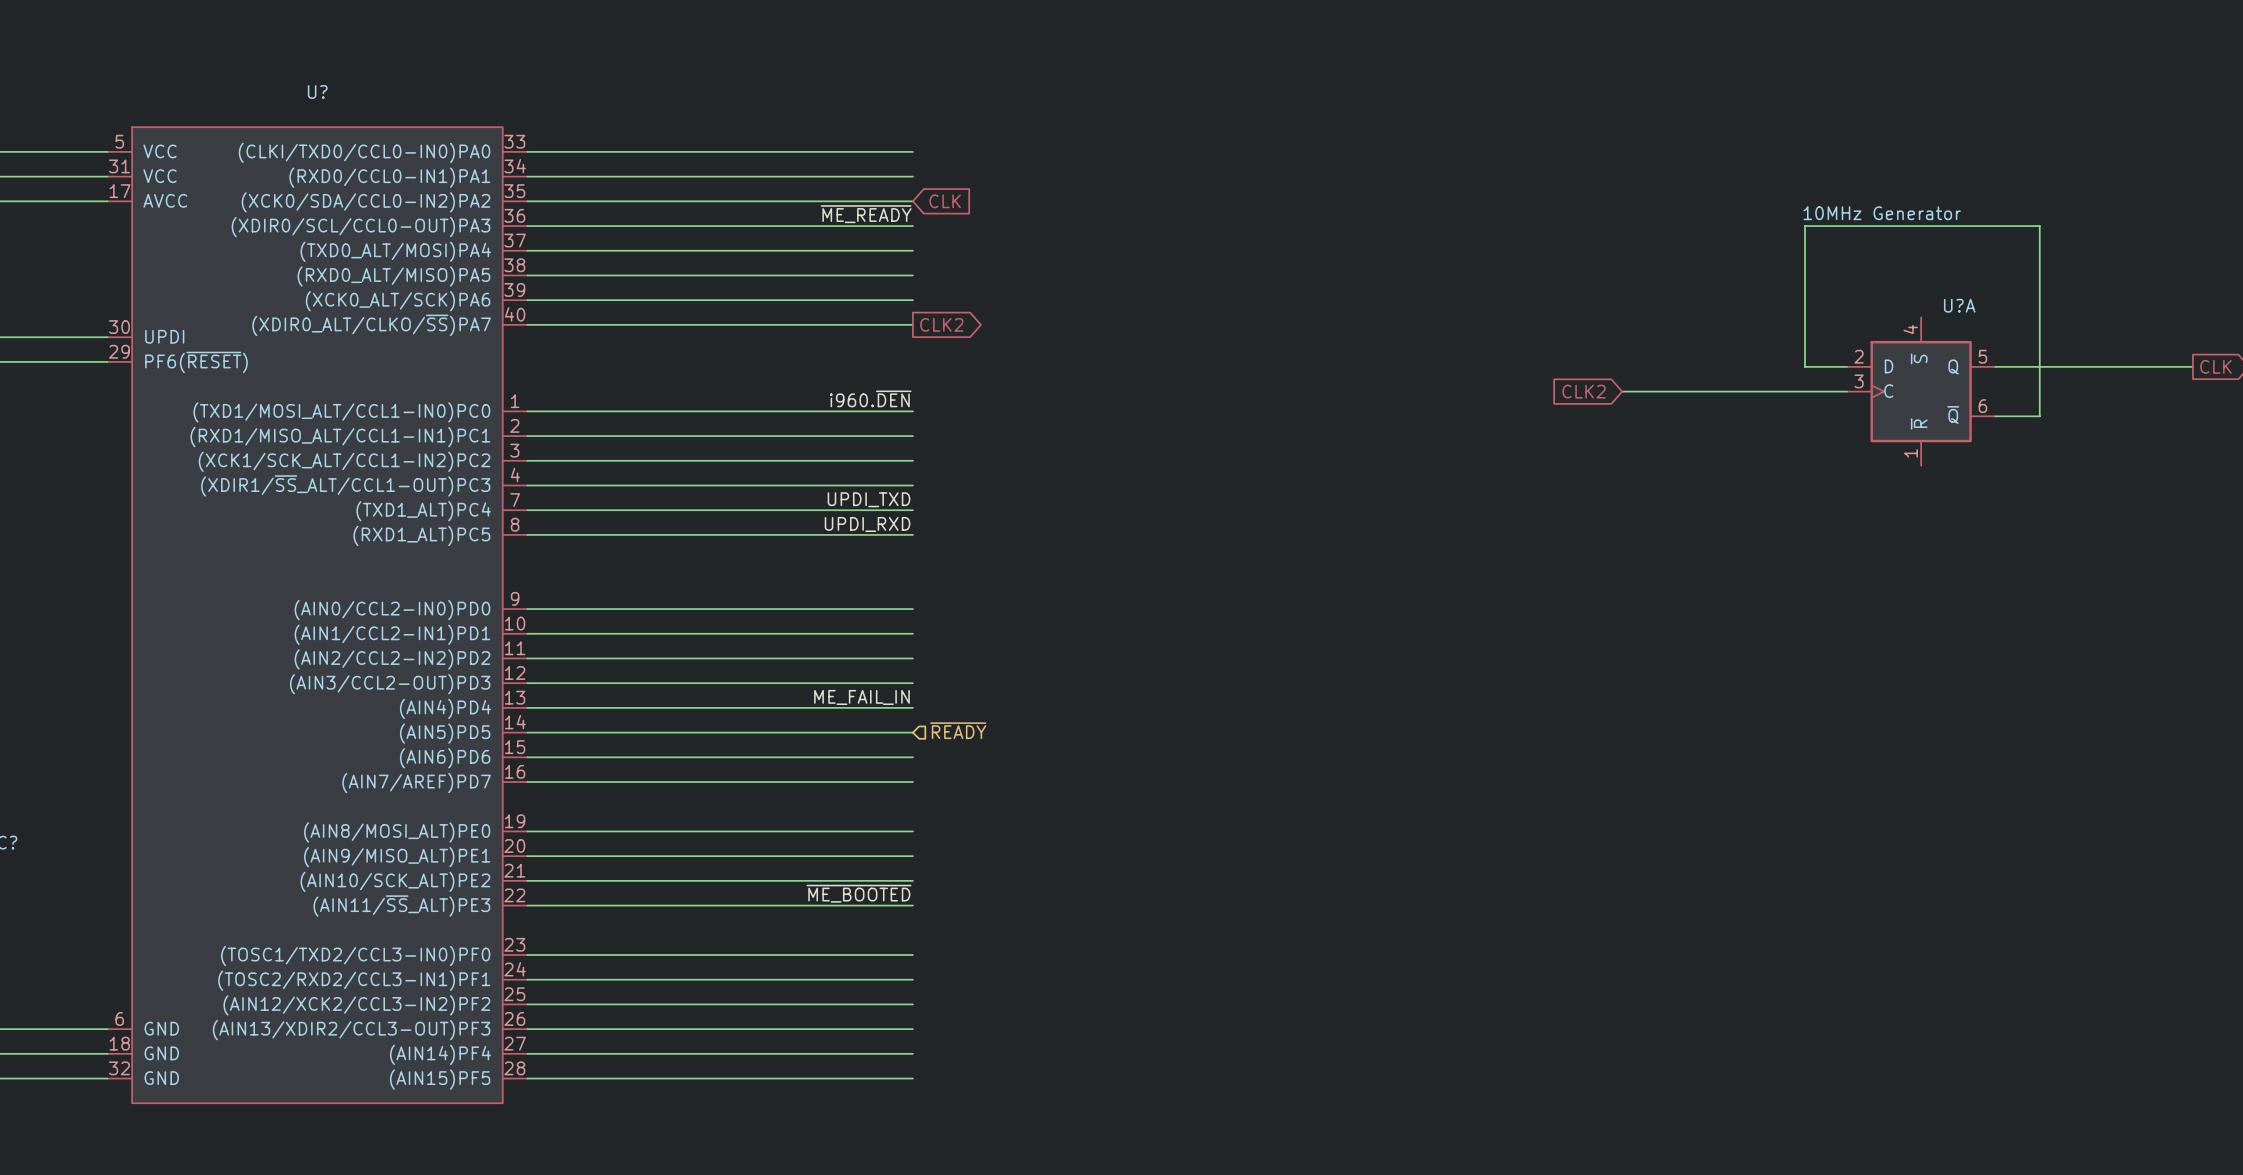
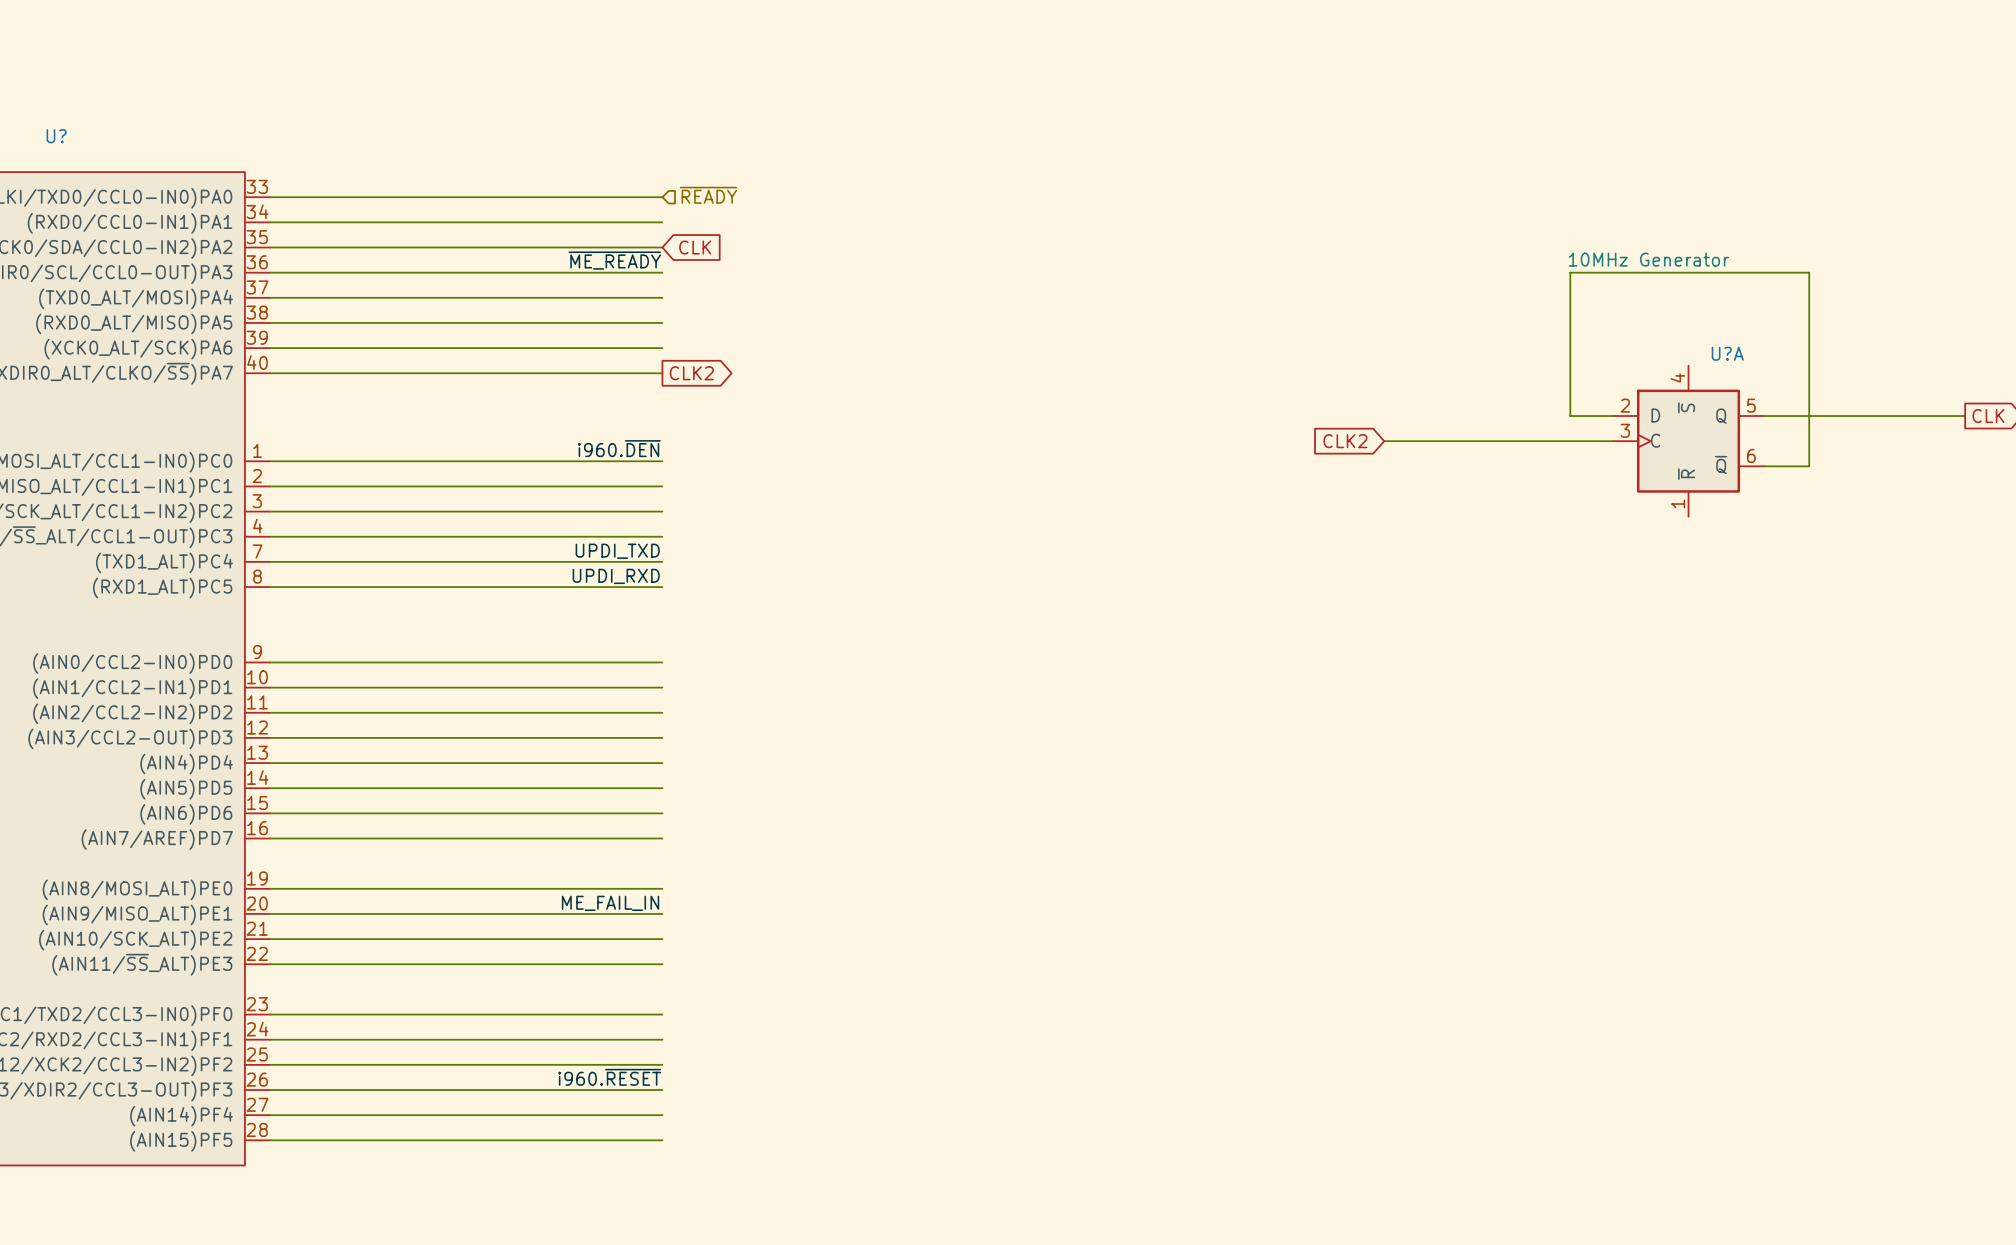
hierarchical label: none -> ~{READY} (708, 195)
label position: ME_FAIL_IN (861, 697) -> ME_FAIL_IN (610, 903)
hierarchical label: ~{READY} (958, 730) -> none
label: ~{ME_BOOTED} (859, 893) -> none
label: none -> i960.~{RESET} (609, 1077)

